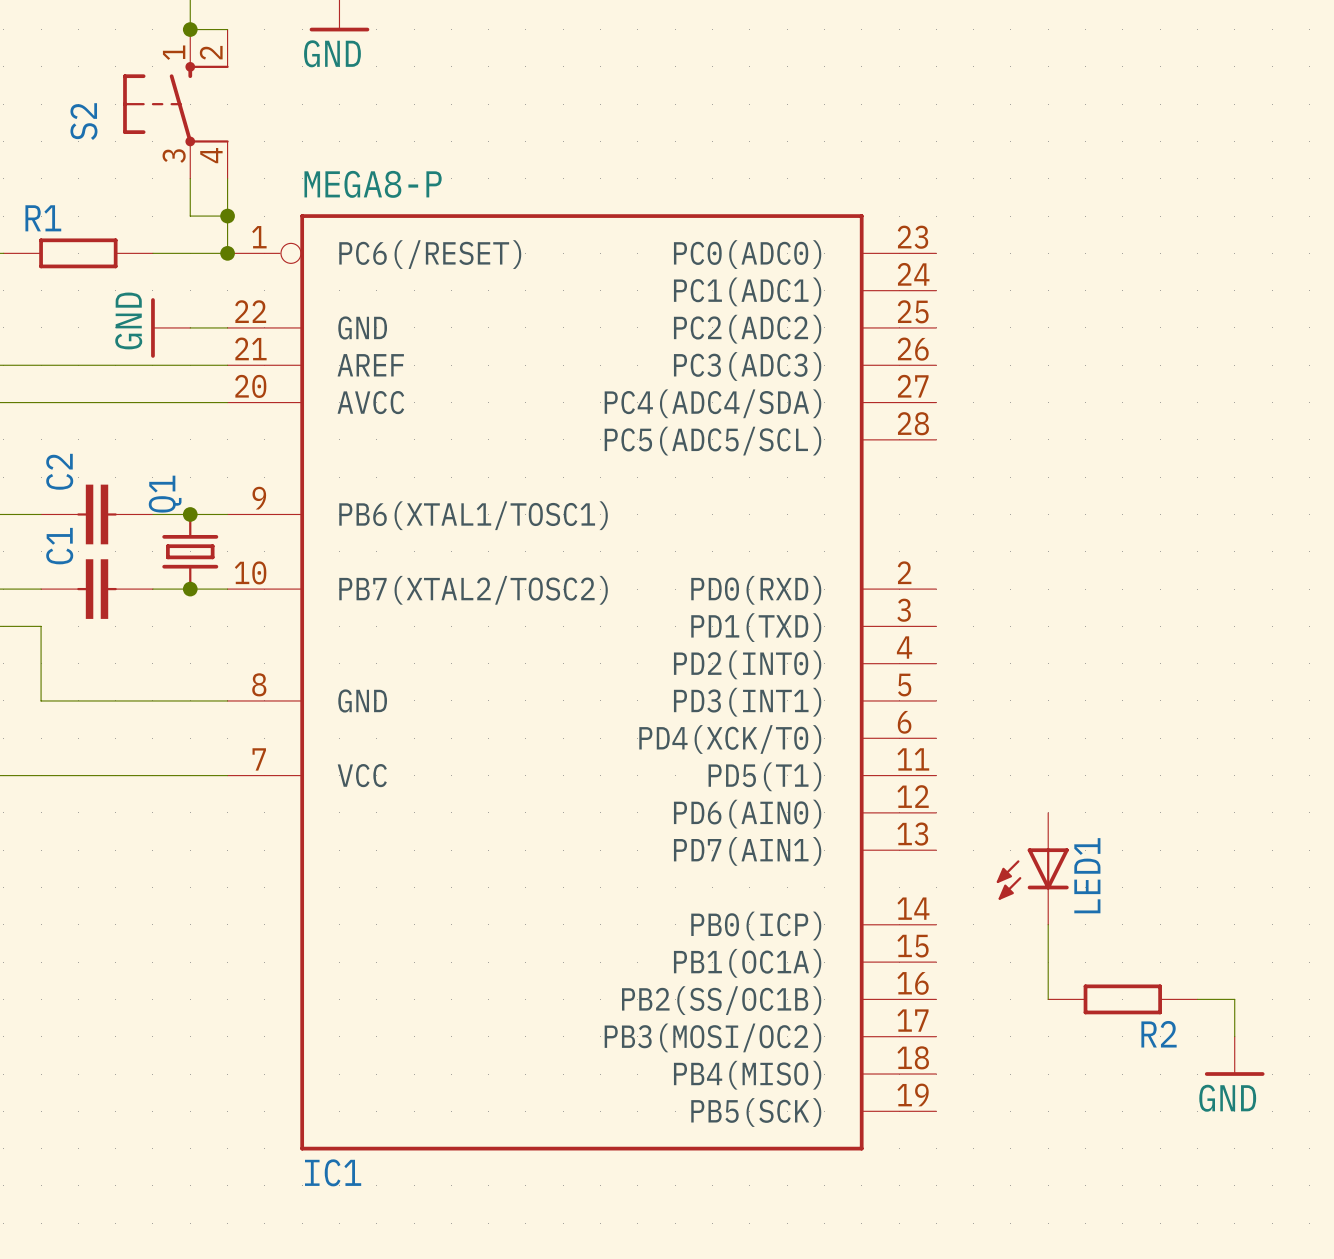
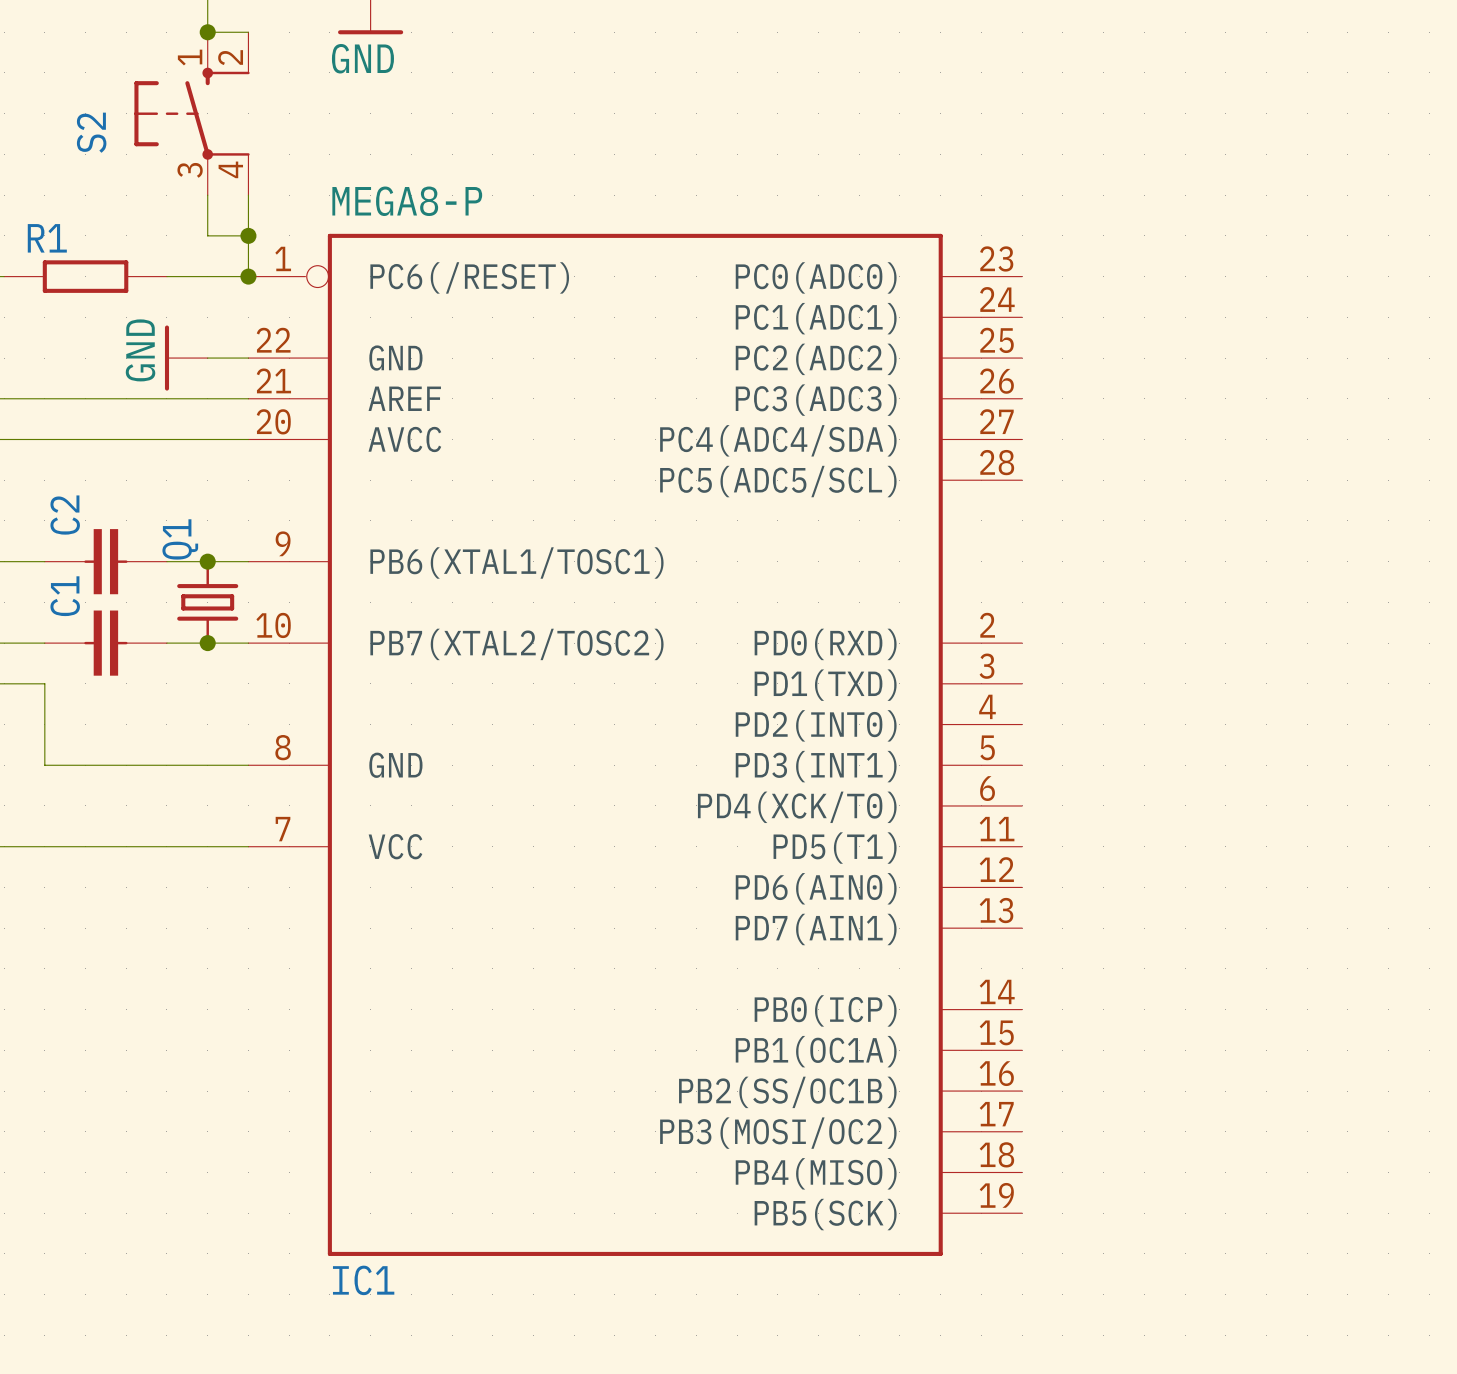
LED1: (1032, 868) -> none
wire: (1048, 924) (1048, 999) -> none
R2: (1122, 999) -> none
wire: (1197, 999) (1234, 999) (1234, 1036) -> none
power symbol: GND (1234, 1056) -> none

